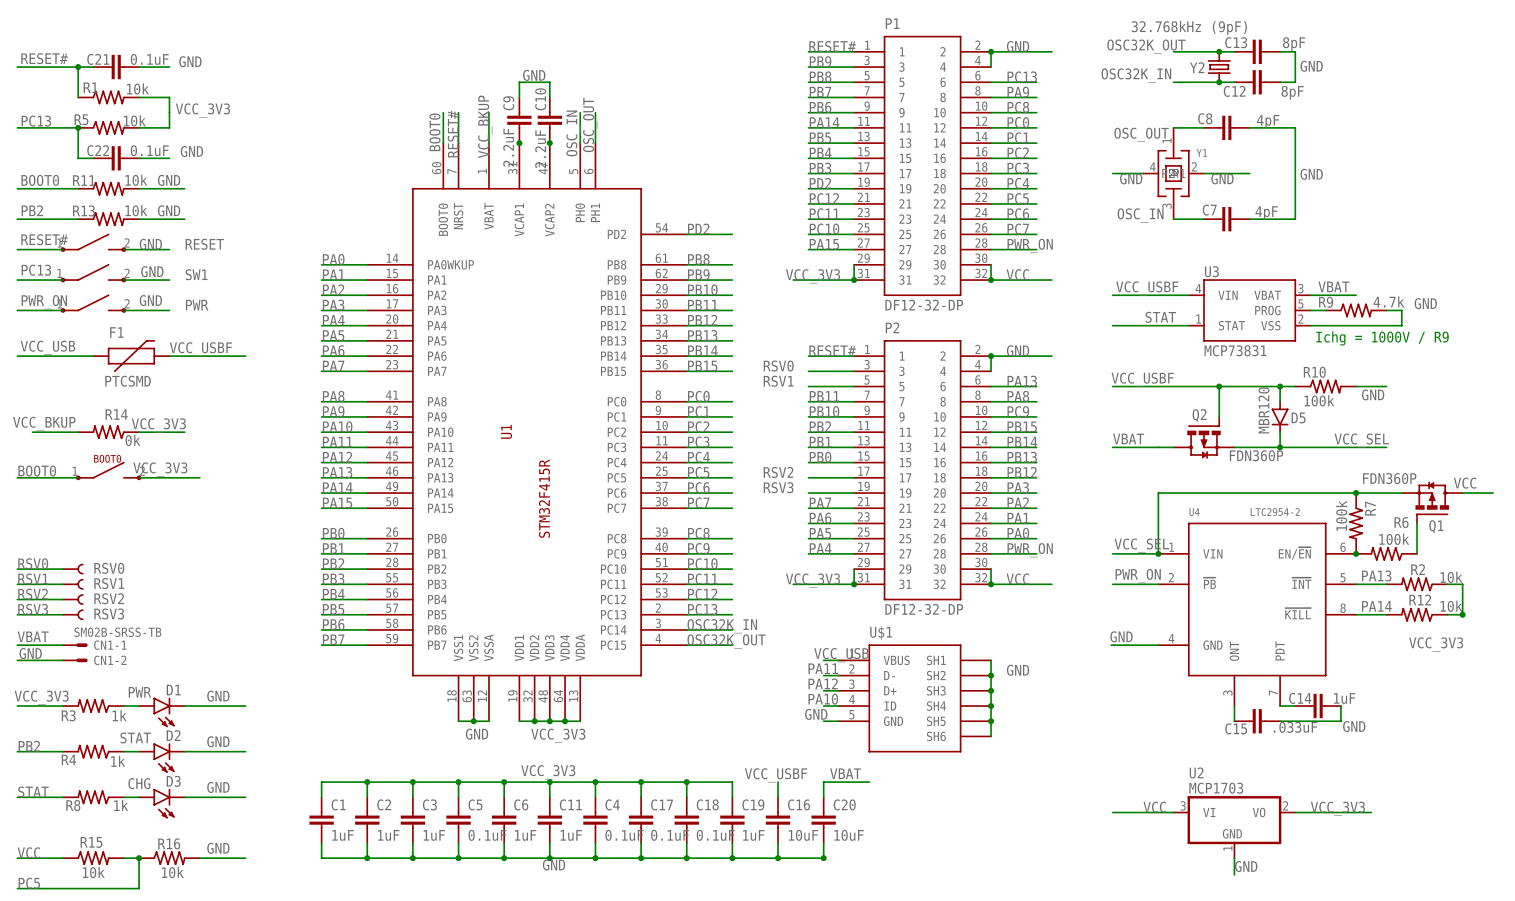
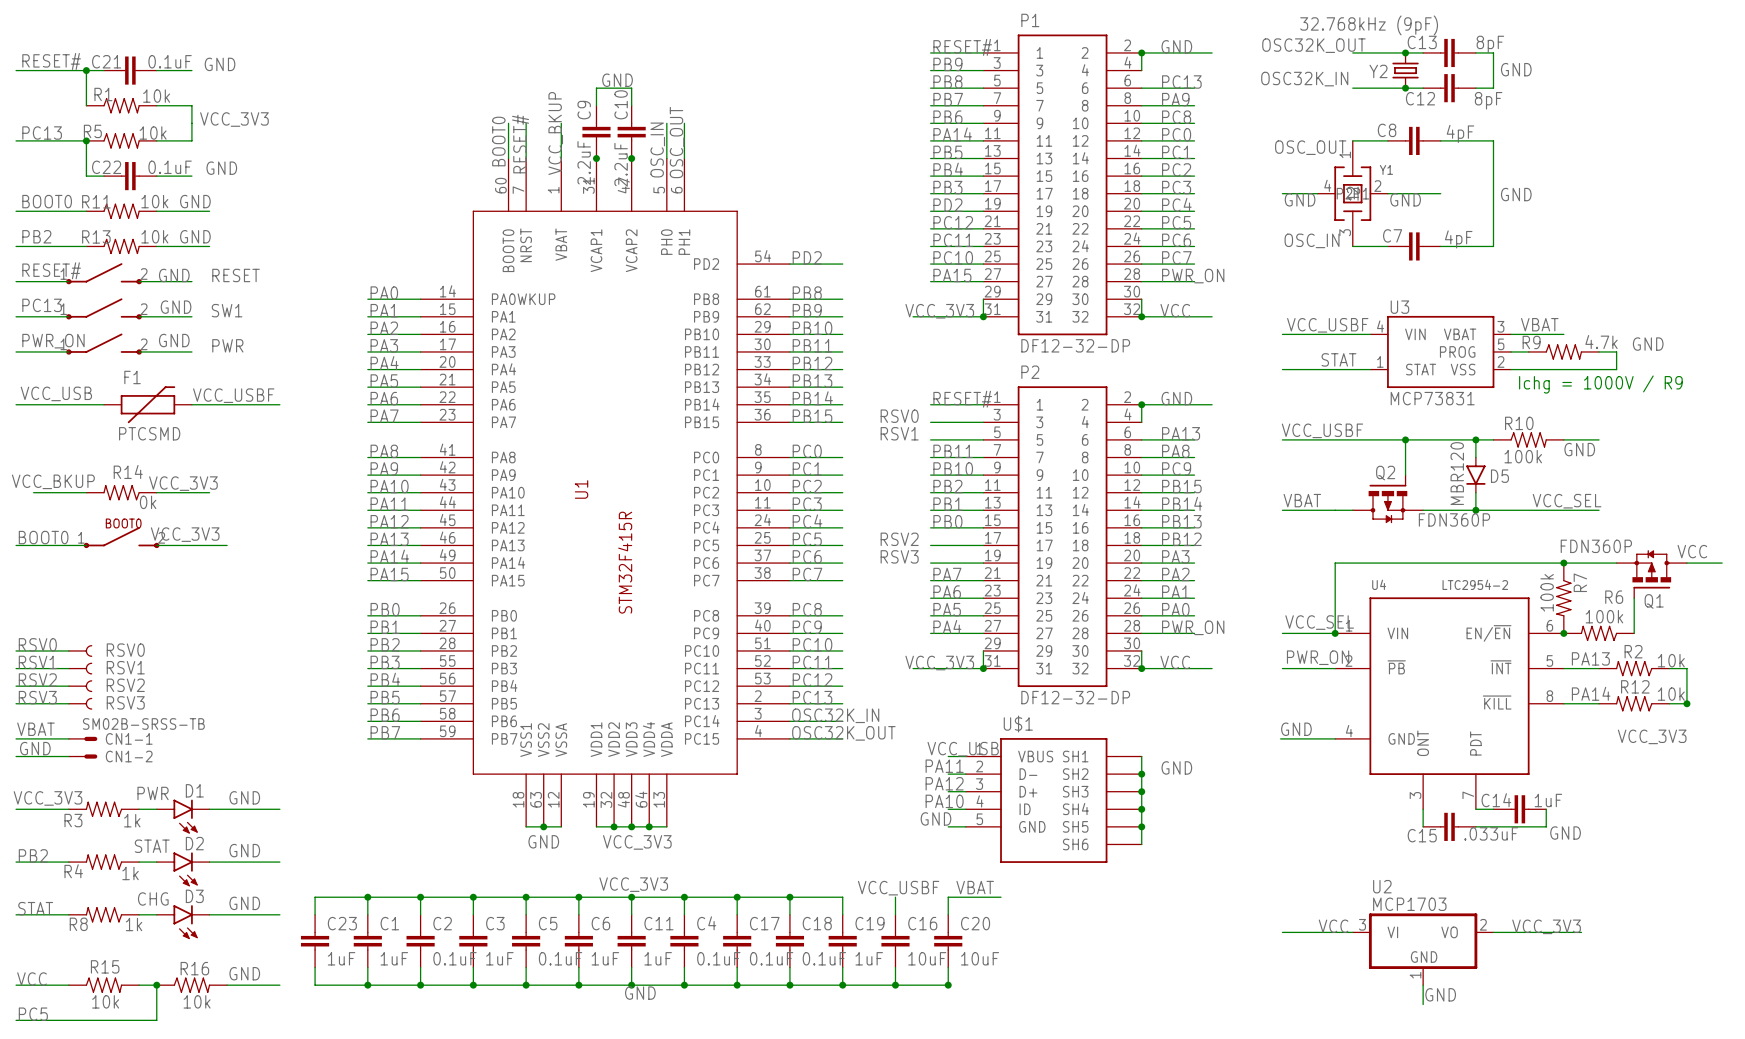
wire: none -> (367, 897) (315, 897) (315, 914)
junction: none -> (367, 897)
C23: none -> 1uF (315, 941)
C2 value: 1uF (388, 835) -> 0.1uF (455, 958)
wire: none -> (315, 967) (315, 985) (367, 985)
junction: none -> (367, 985)

